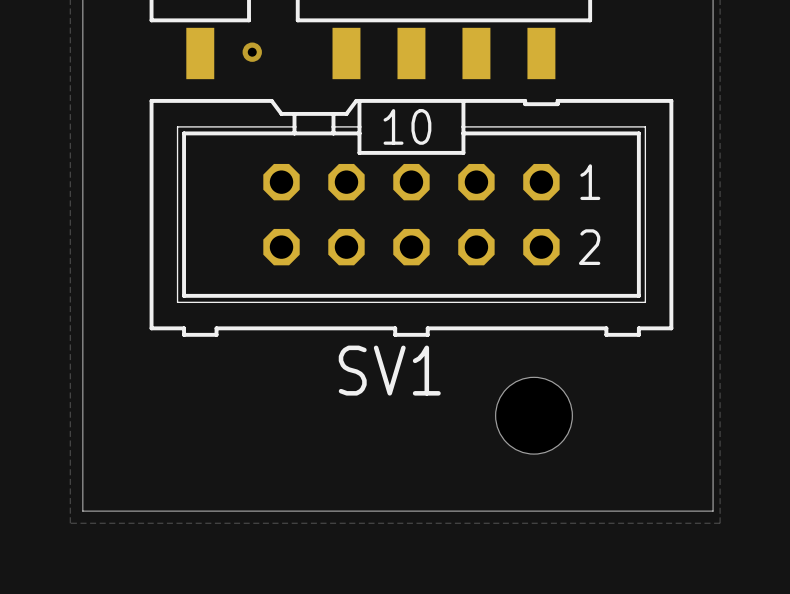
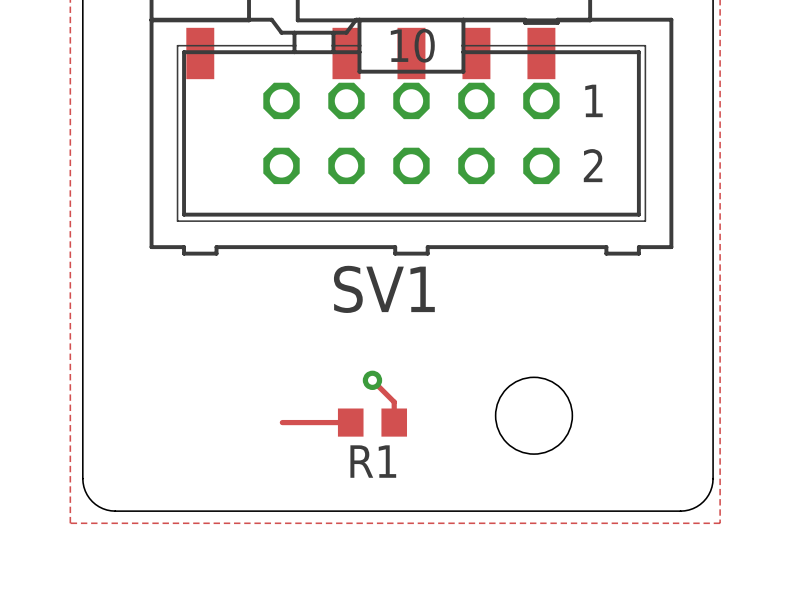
via: (252, 52) -> none
SV1 position: (411, 217) -> (411, 136)
track: none -> (372, 380) (394, 402) (394, 422)
via: none -> (372, 380)
track: none -> (282, 422) (350, 422)
R1: none -> (372, 422)
board edge: (82, 478) (82, 511) (115, 511) -> (82, 478) (85, 491) (92, 501) (102, 508) (115, 511)
board edge: (713, 478) (713, 511) (680, 511) -> (713, 478) (710, 491) (703, 501) (693, 508) (680, 511)

